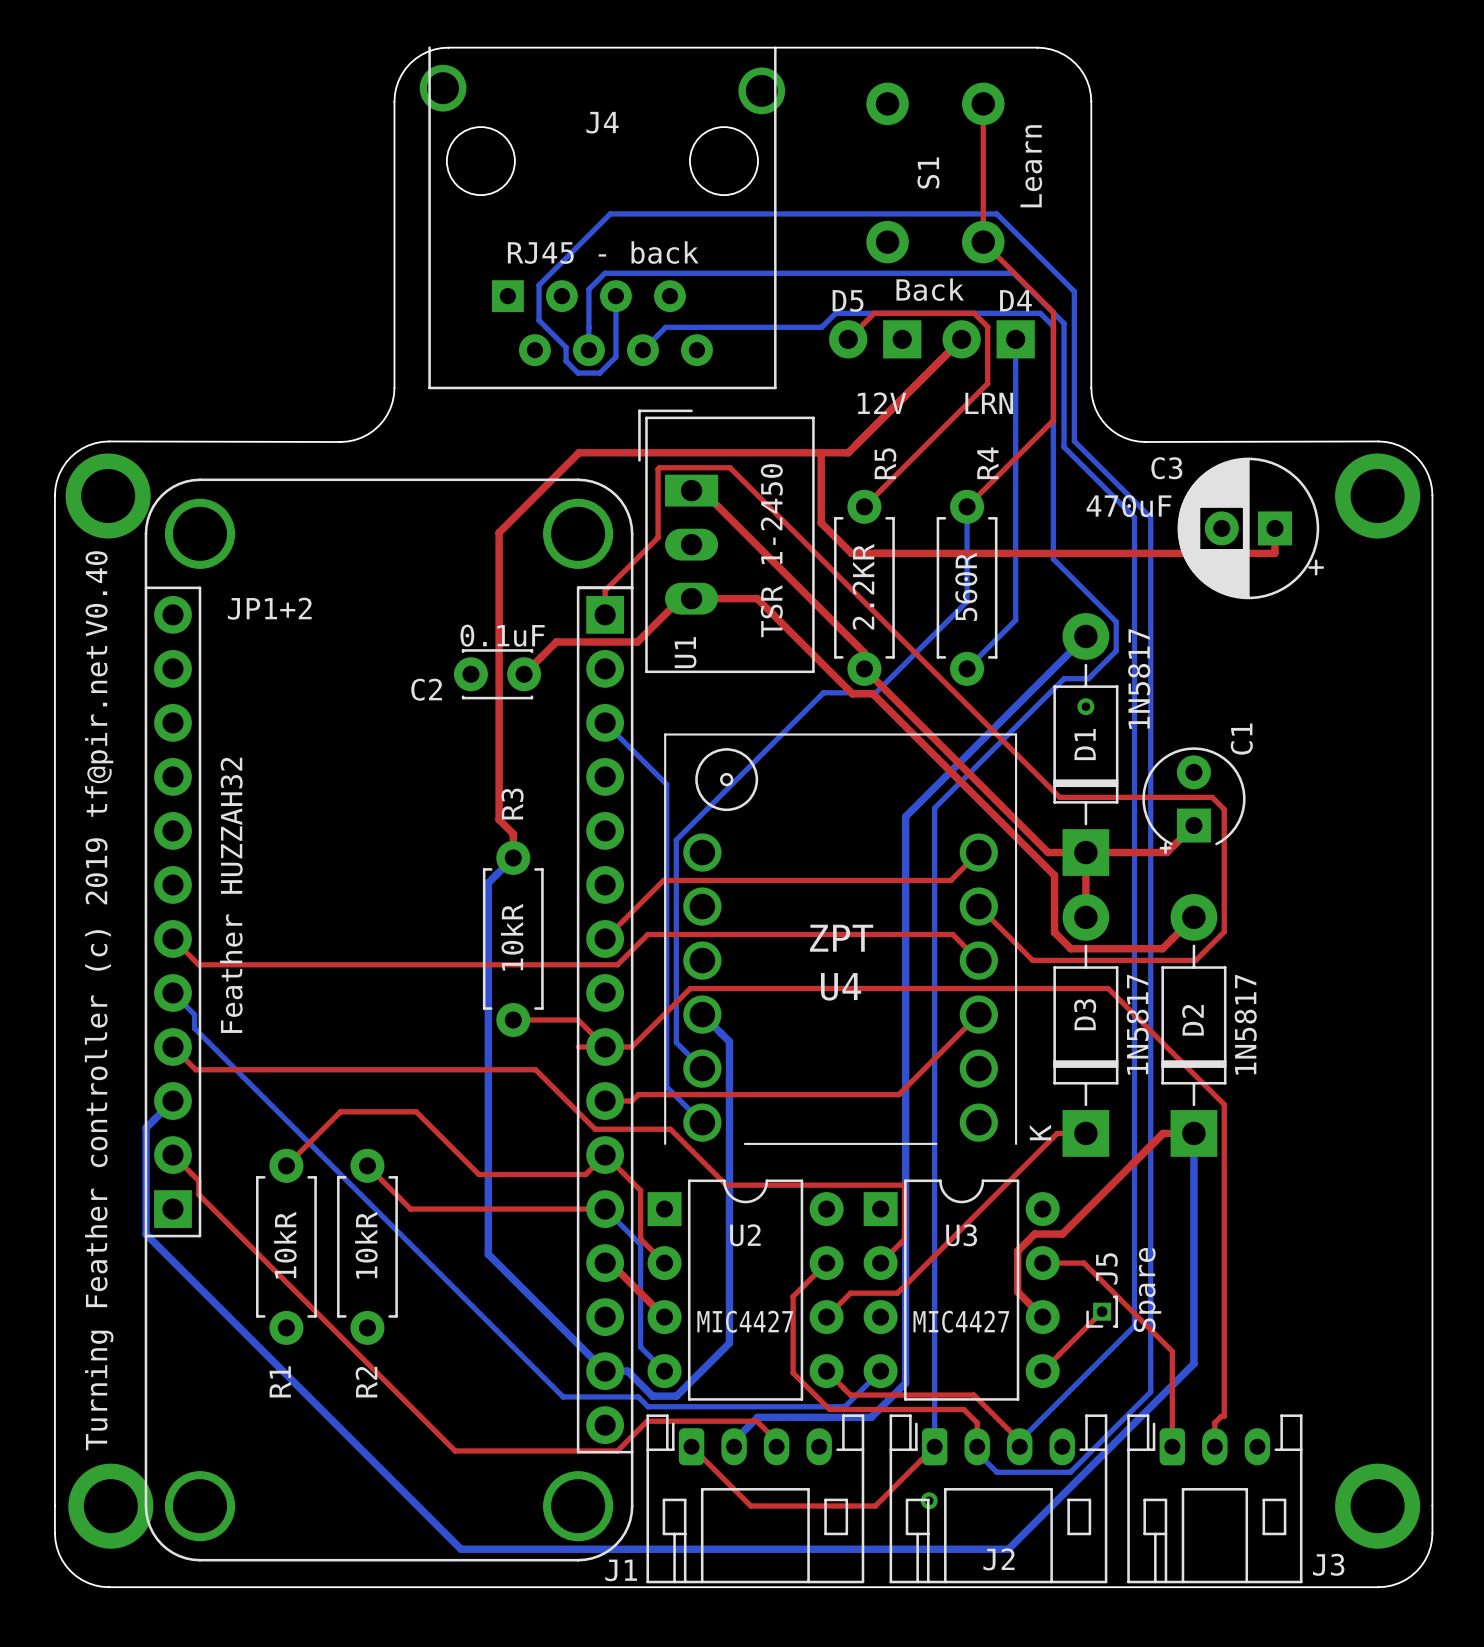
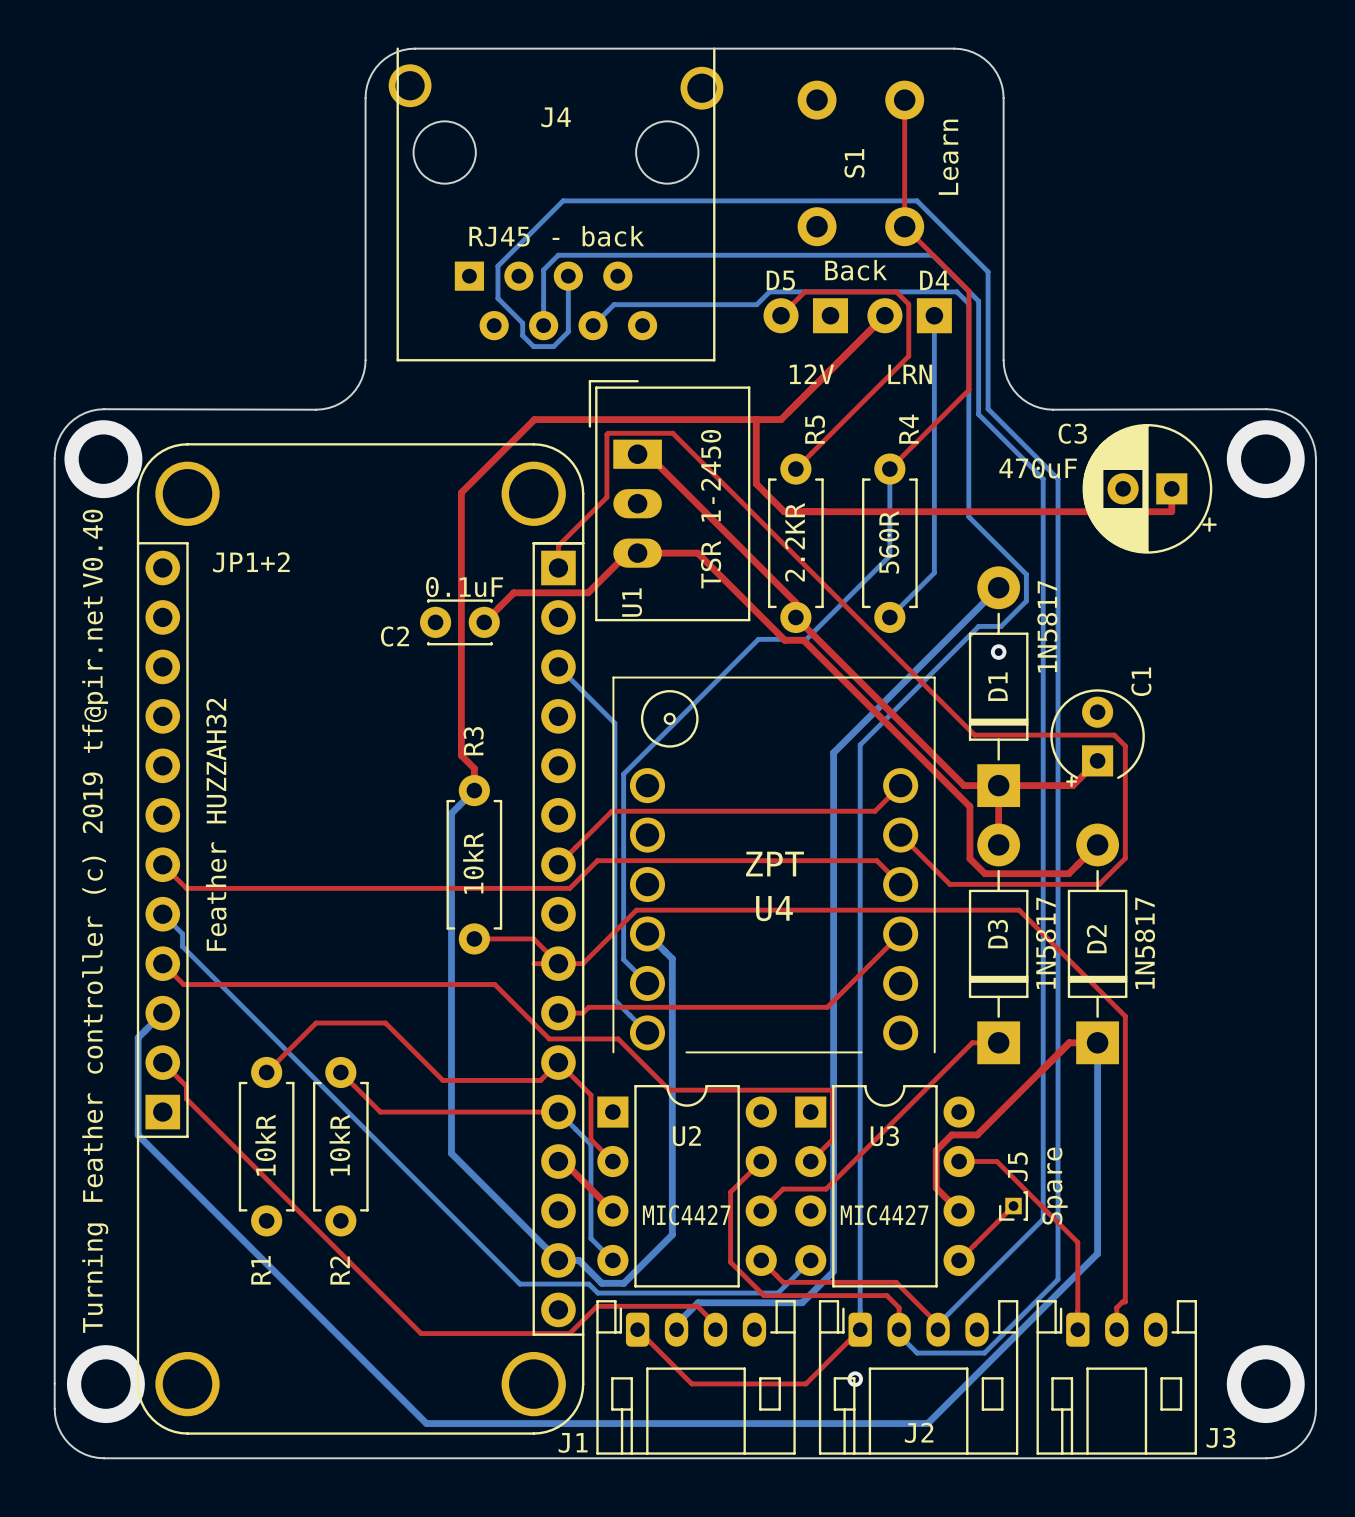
D3 text: K (1040, 1132) -> none

